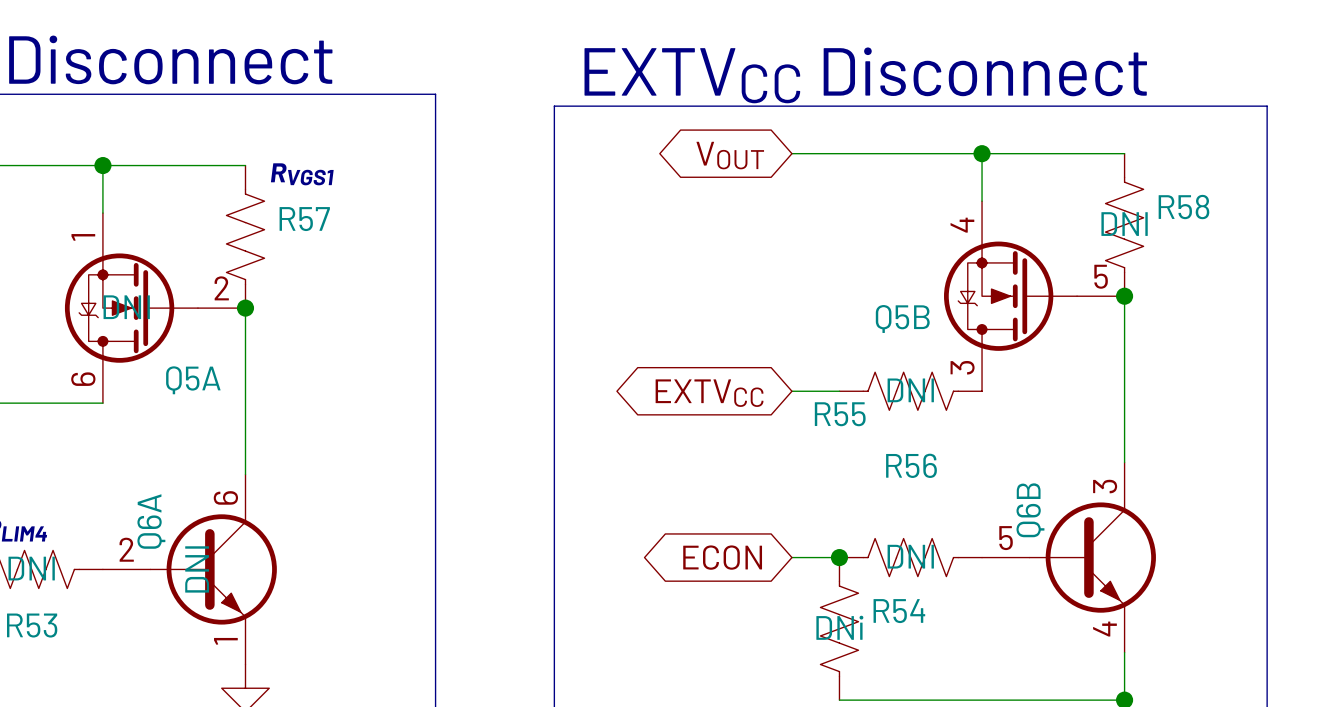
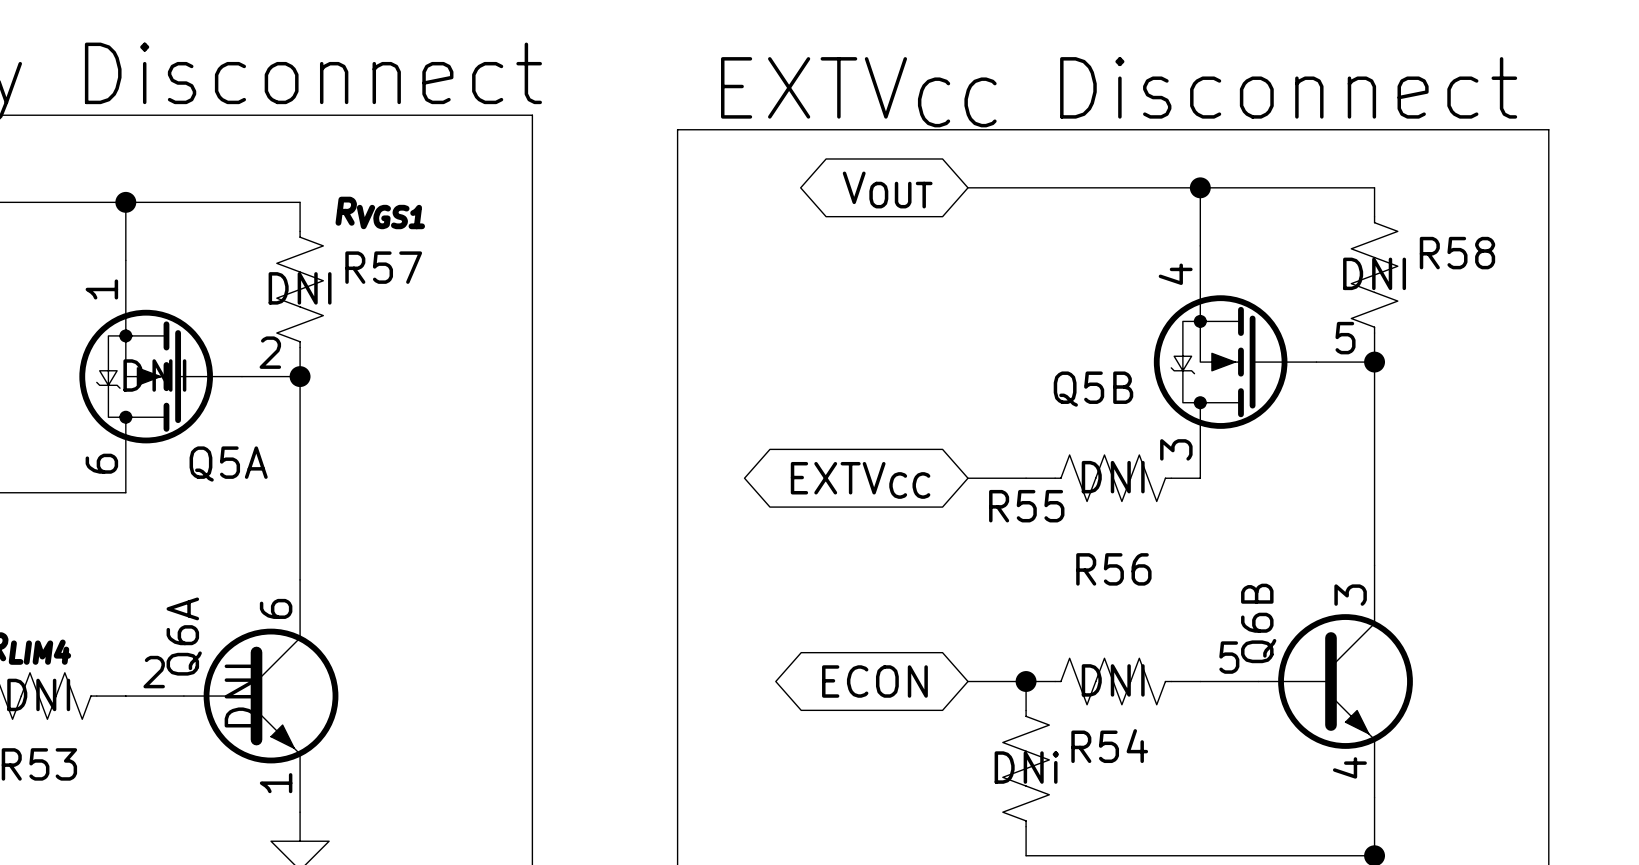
R57 text: none -> DNI (300, 288)

